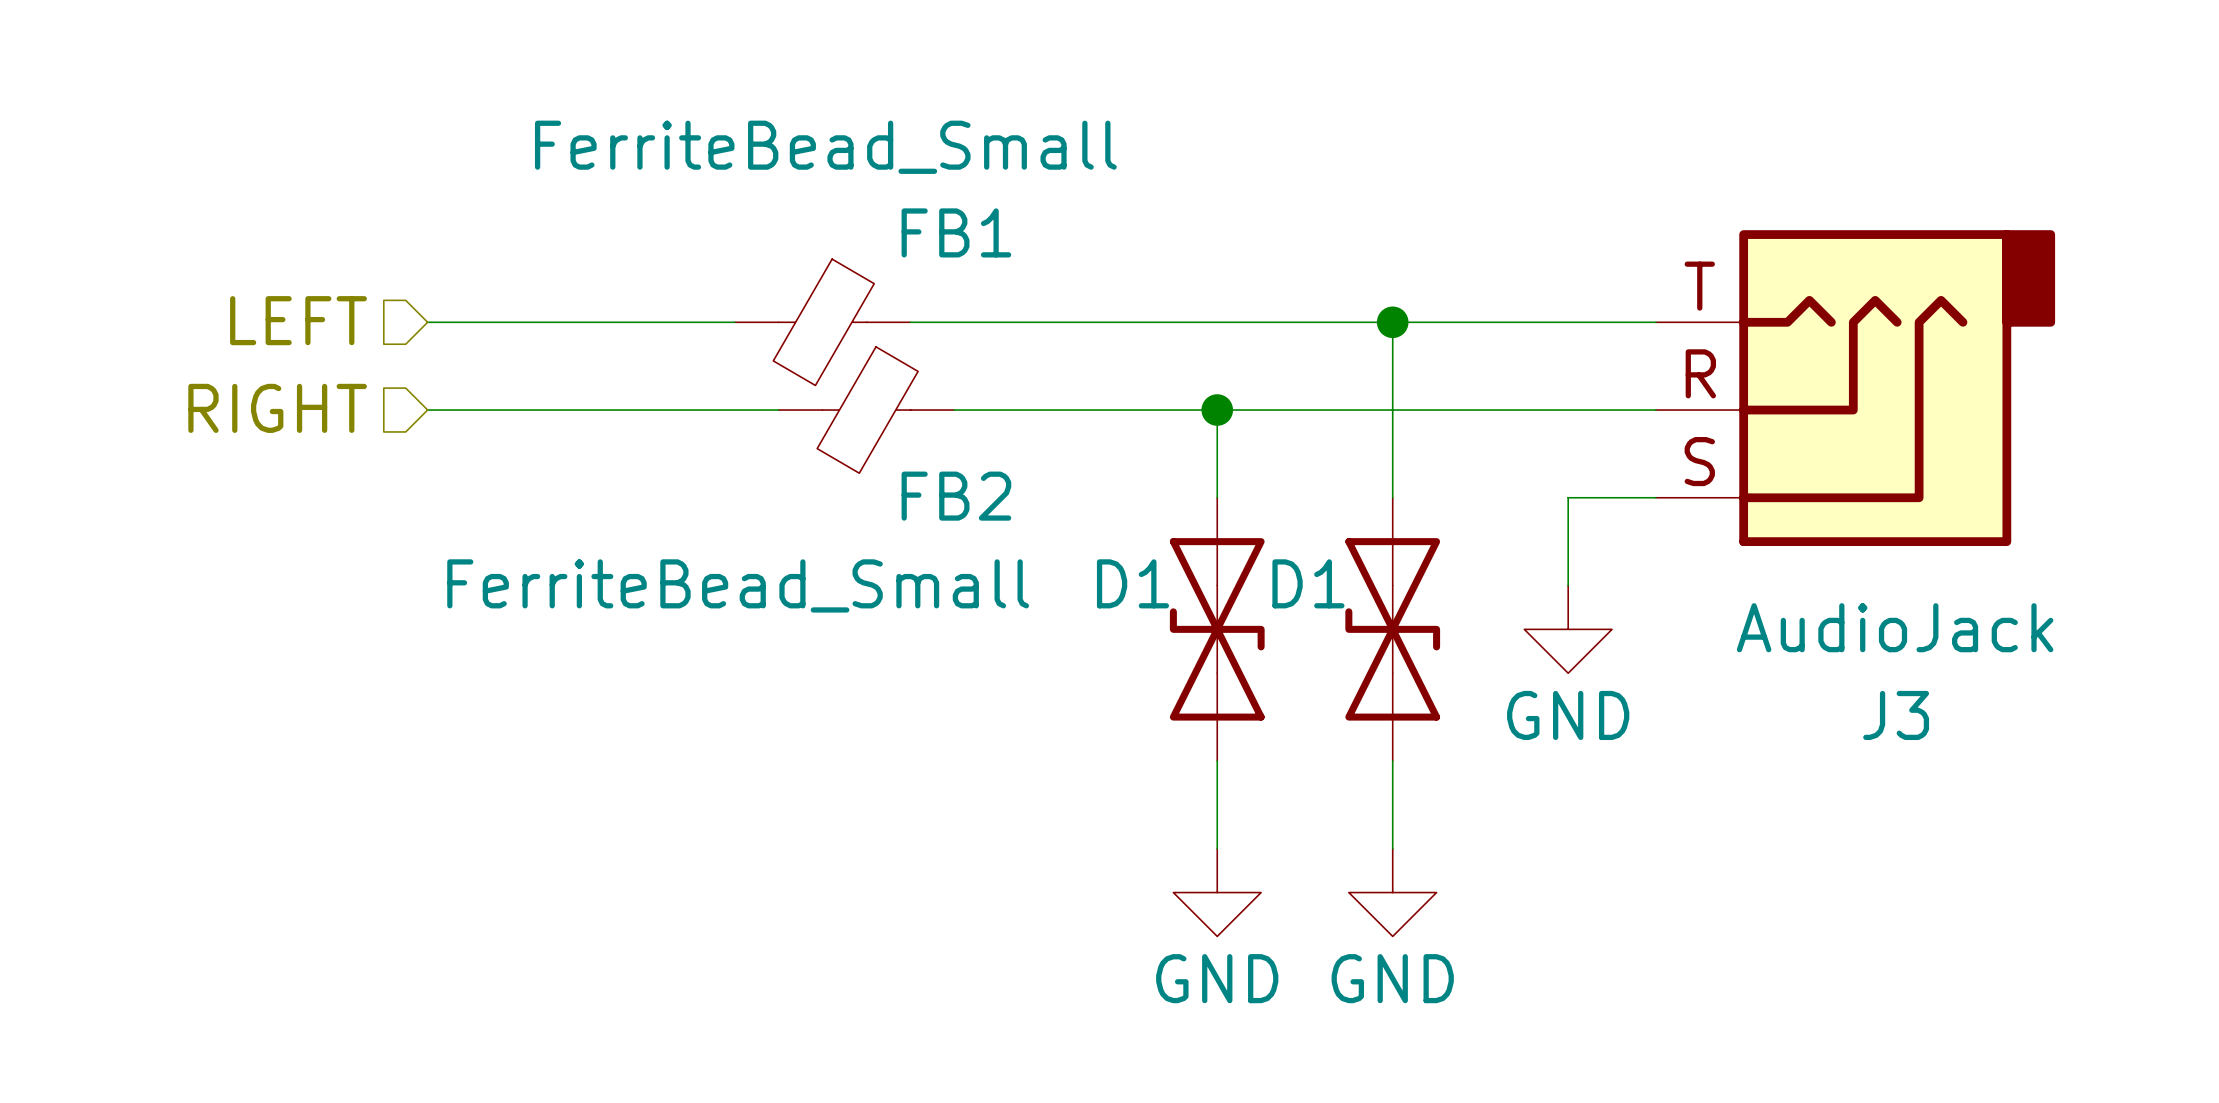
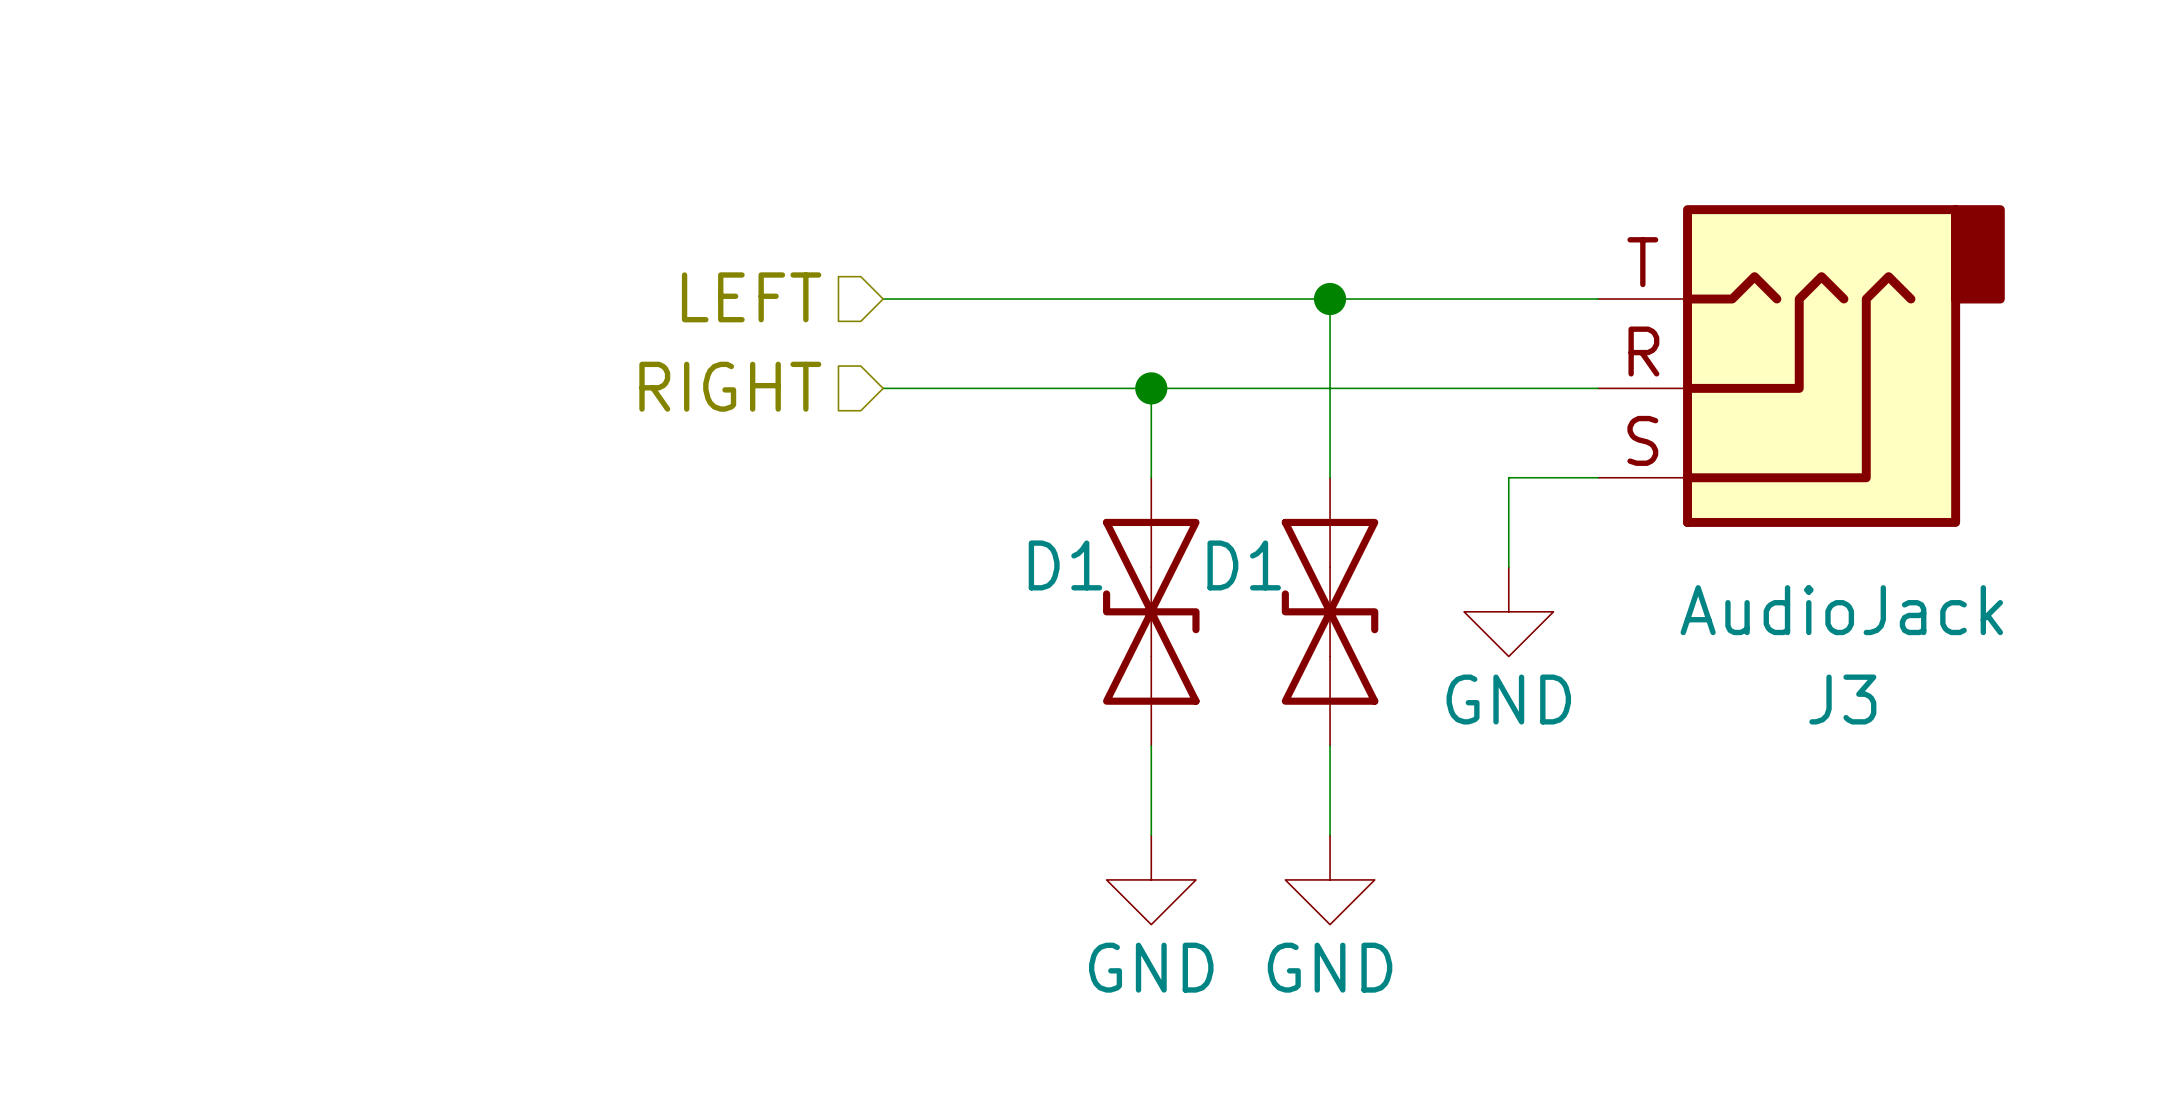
hierarchical label position: LEFT (298, 320) -> LEFT (751, 297)
wire: (427, 322) (734, 322) -> none
FB1: FerriteBead_Small (822, 322) -> none
wire: (910, 322) (954, 322) -> none
hierarchical label position: RIGHT (277, 408) -> RIGHT (730, 386)
wire: (427, 410) (778, 410) -> none
FB2: FerriteBead_Small (866, 410) -> none

